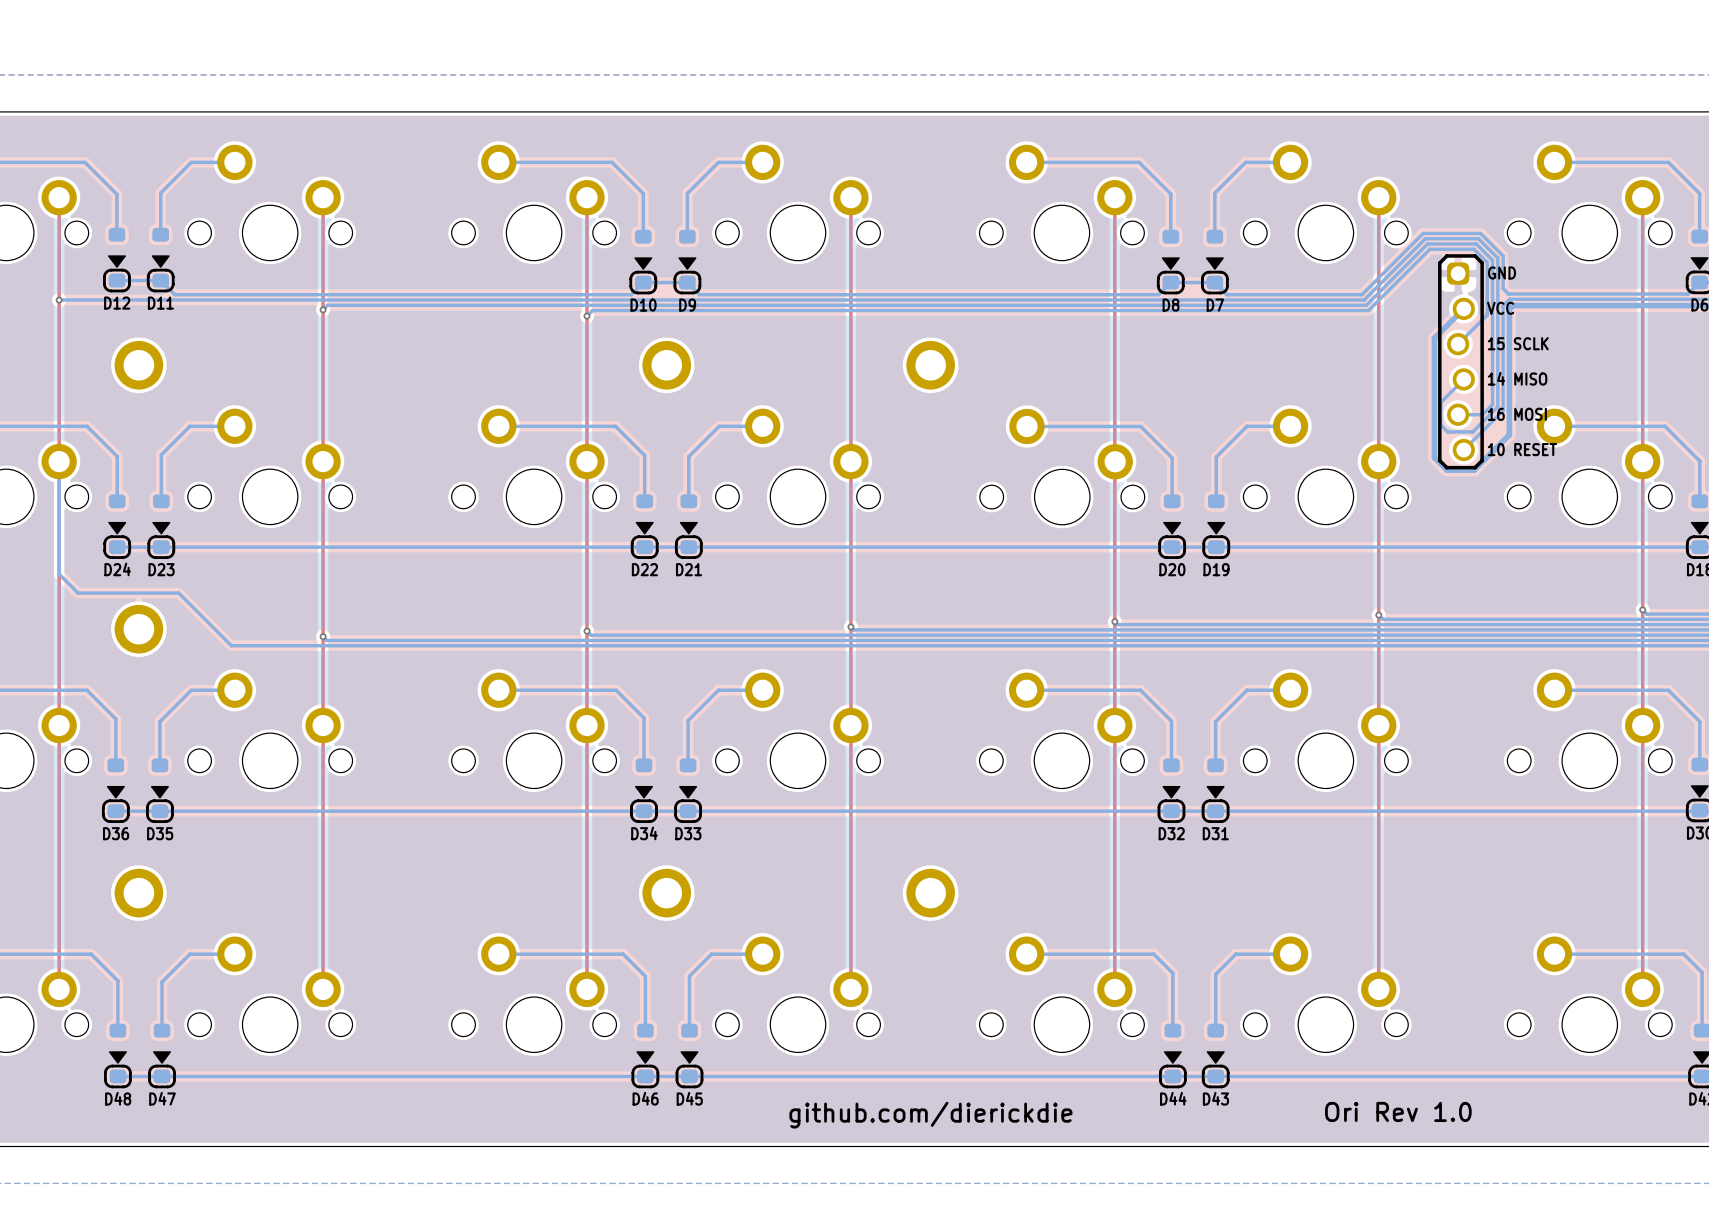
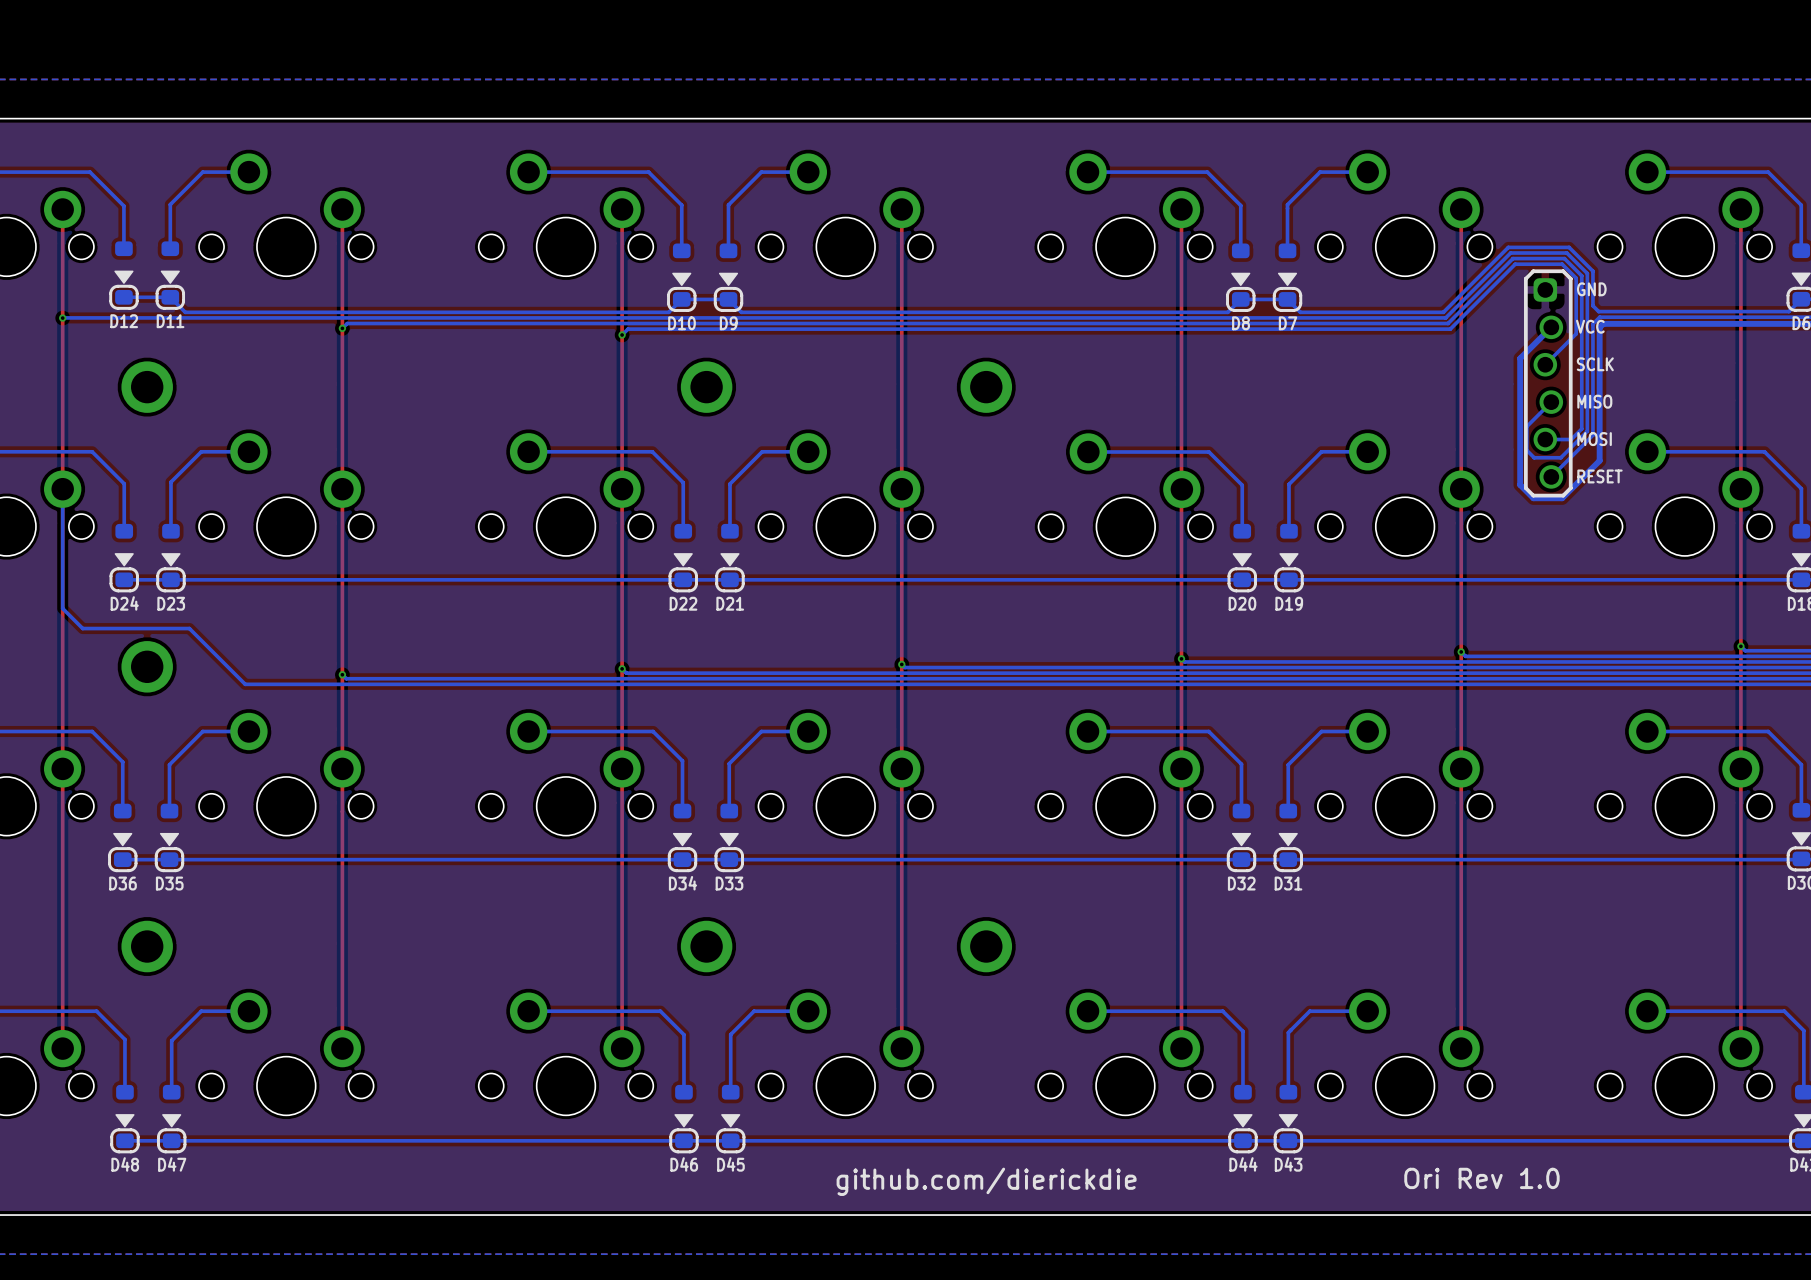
part text: 15 SCLK (1518, 343) -> SCLK (1595, 364)
part text: 14 MISO (1517, 378) -> MISO (1594, 401)
part text: 16 MOSI (1517, 414) -> MOSI (1594, 439)
part text: 10 RESET (1522, 449) -> RESET (1599, 476)

